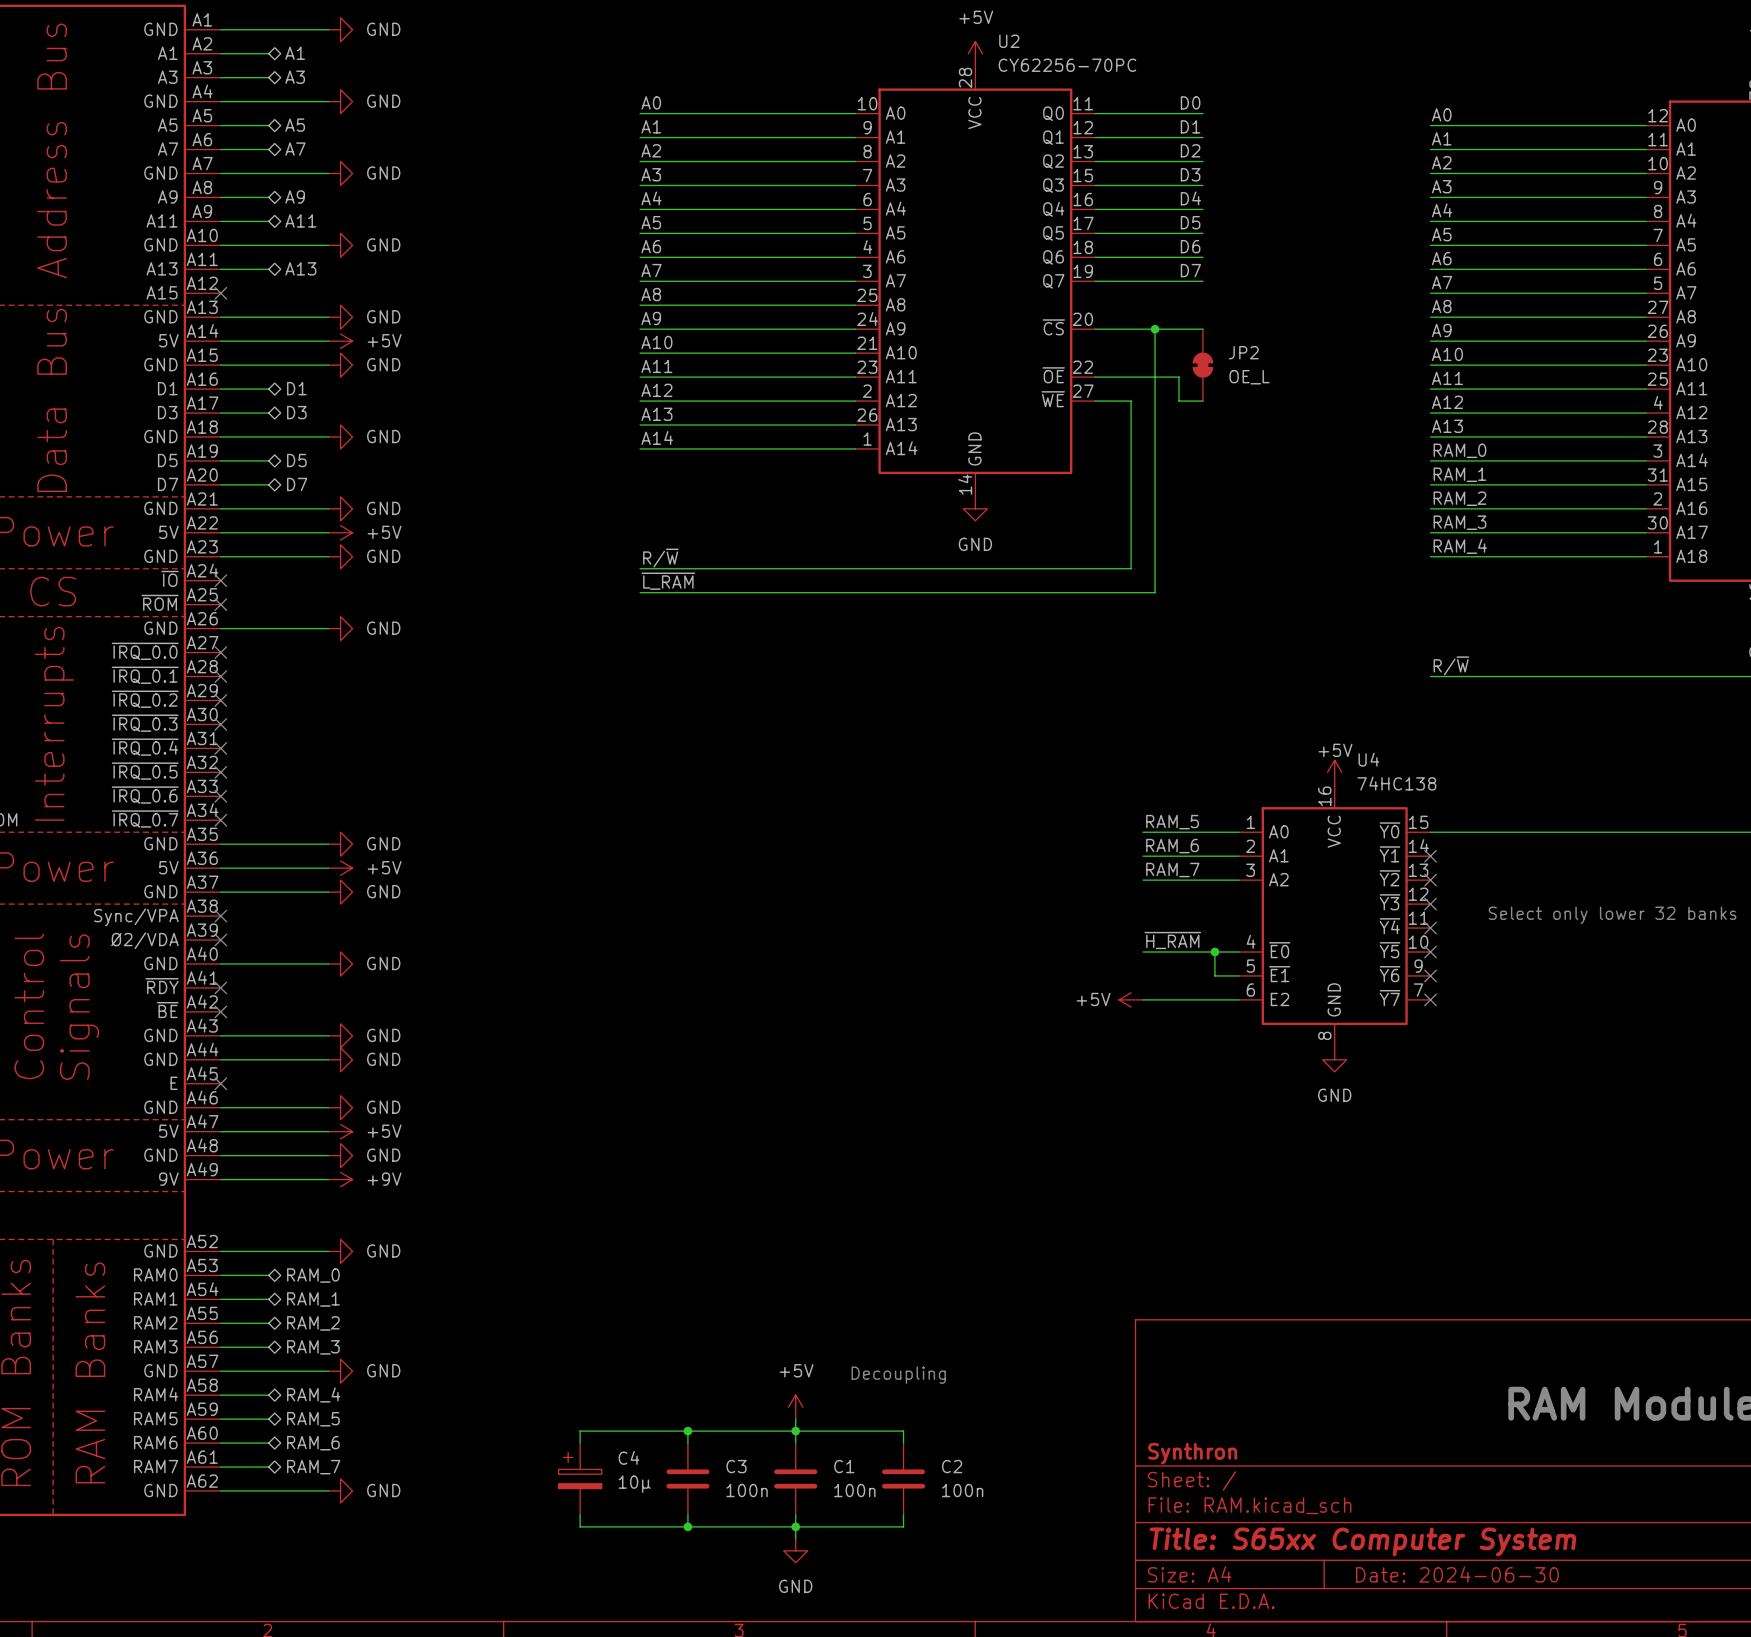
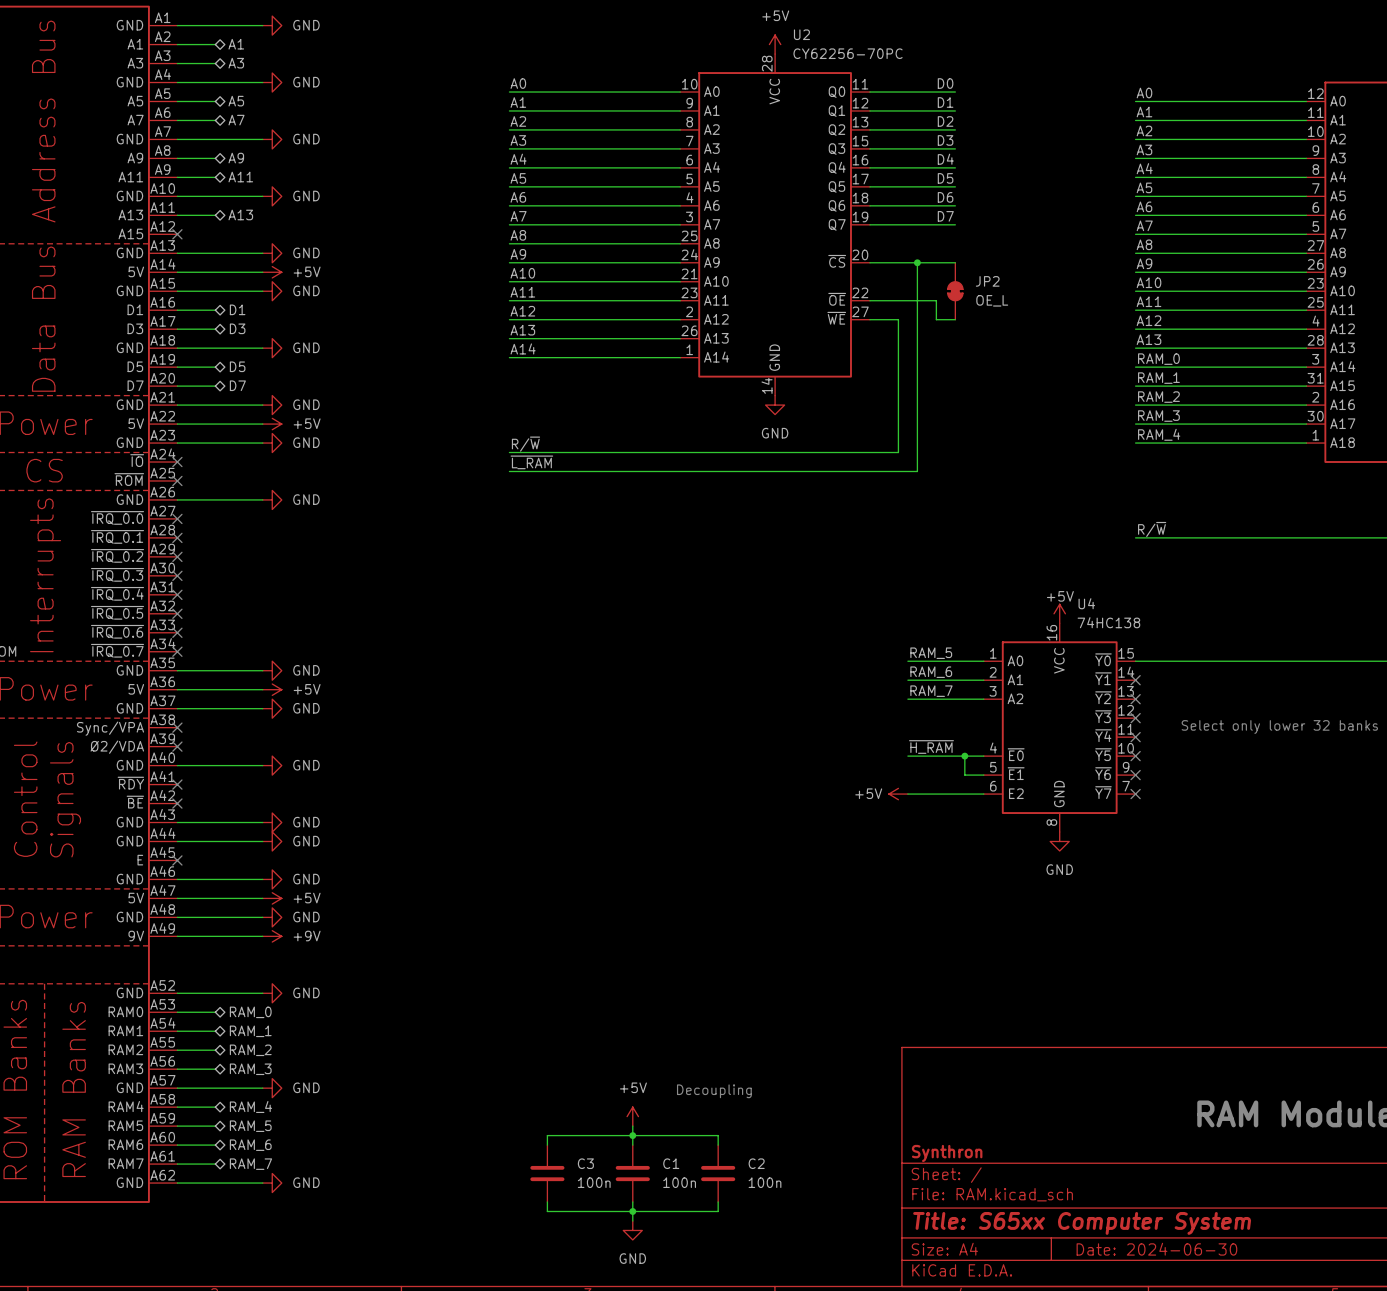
wire: (687, 1431) (580, 1431) (580, 1443) -> none
junction: (687, 1431) -> none
C4: 10µ (580, 1478) -> none
wire: (580, 1514) (580, 1526) (687, 1526) -> none
junction: (687, 1526) -> none

